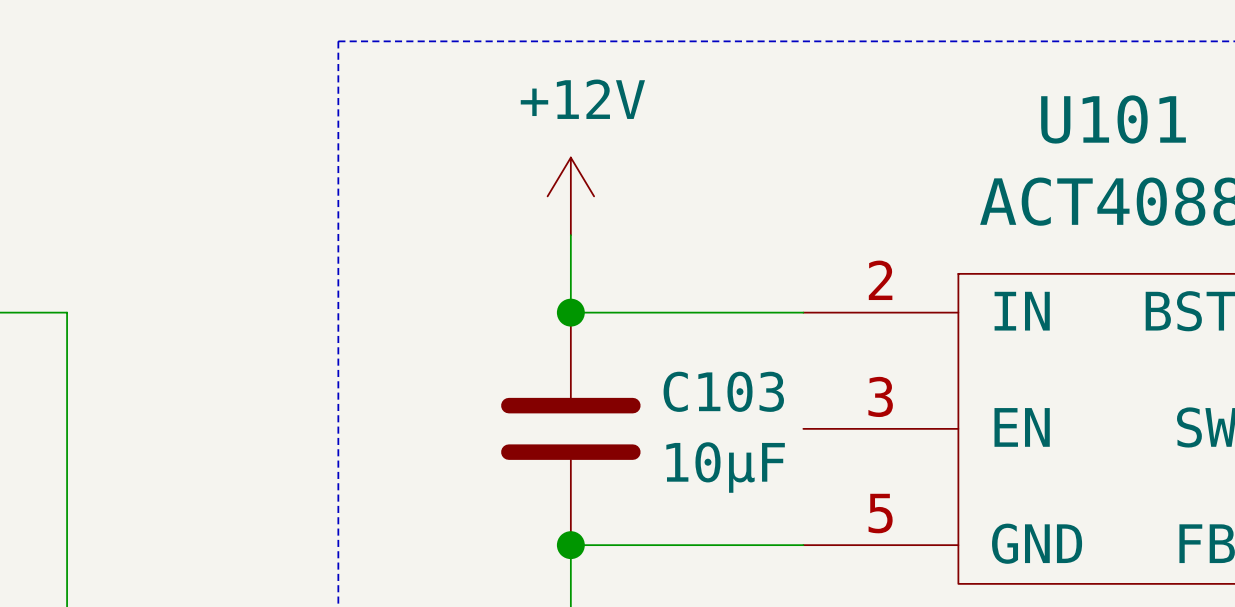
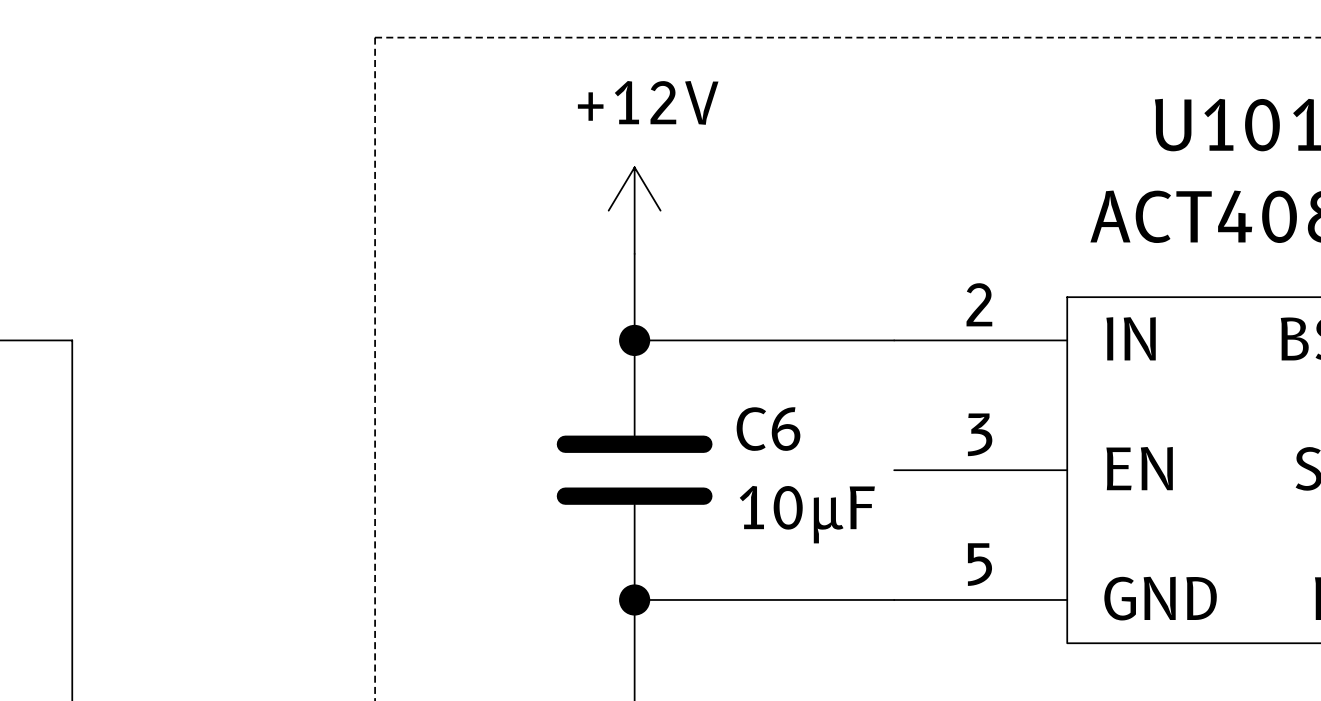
C103 name: C103 (723, 391) -> C6 (768, 429)

